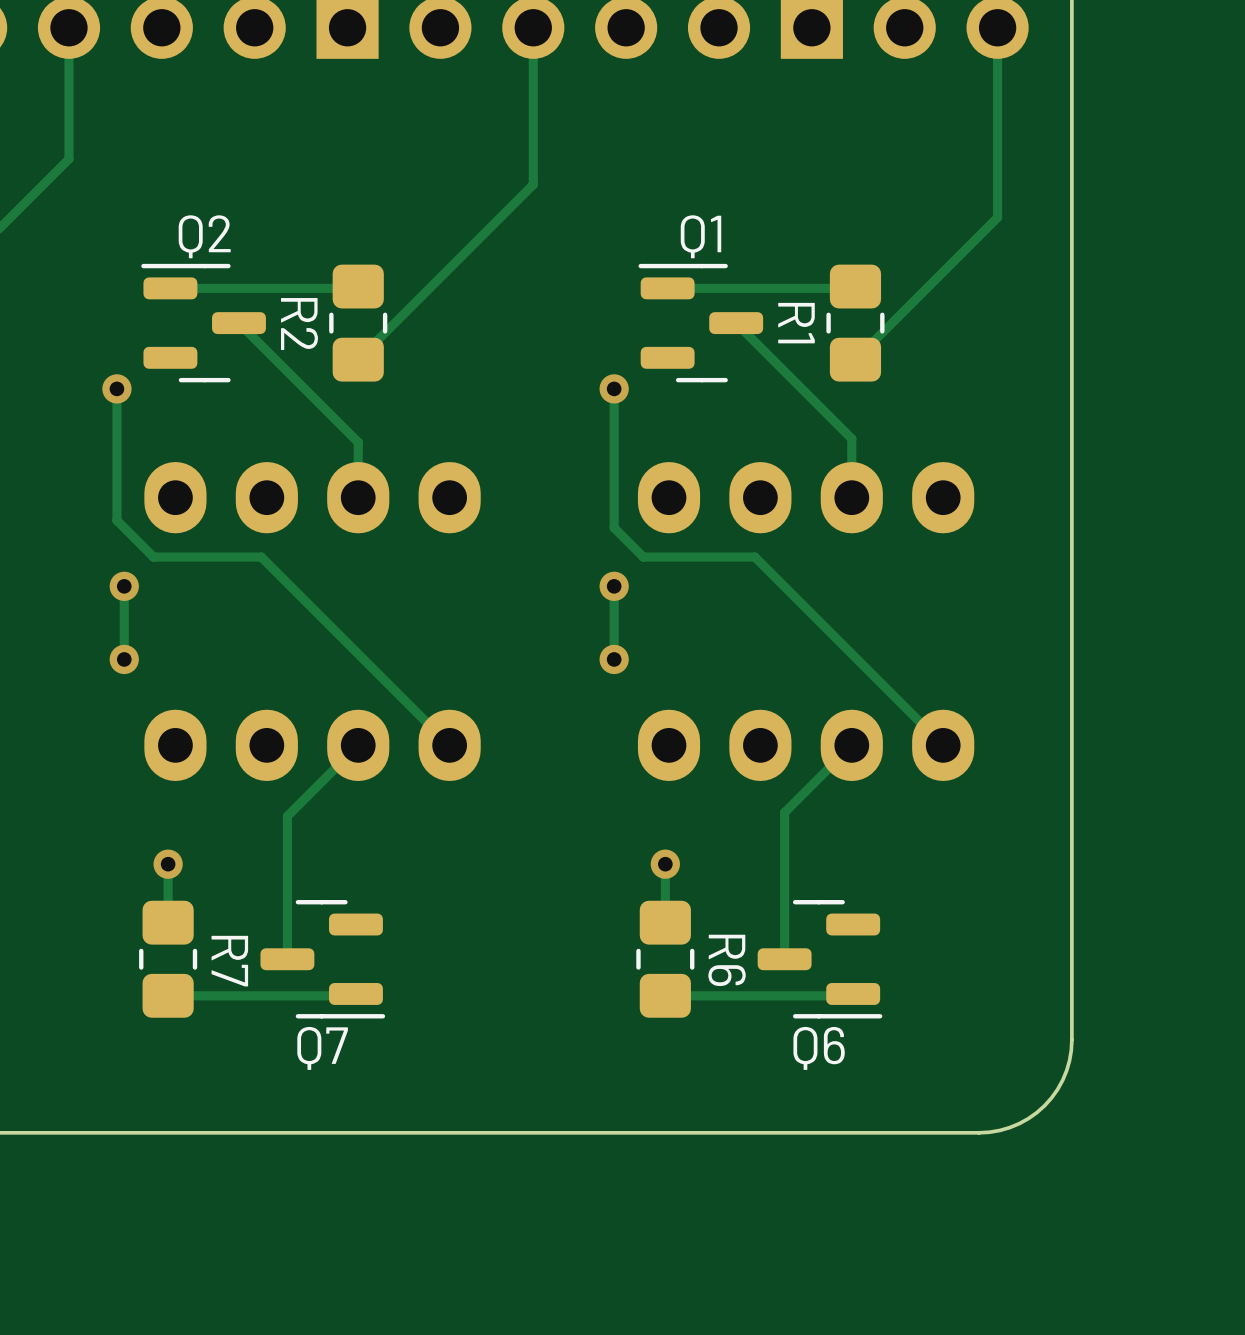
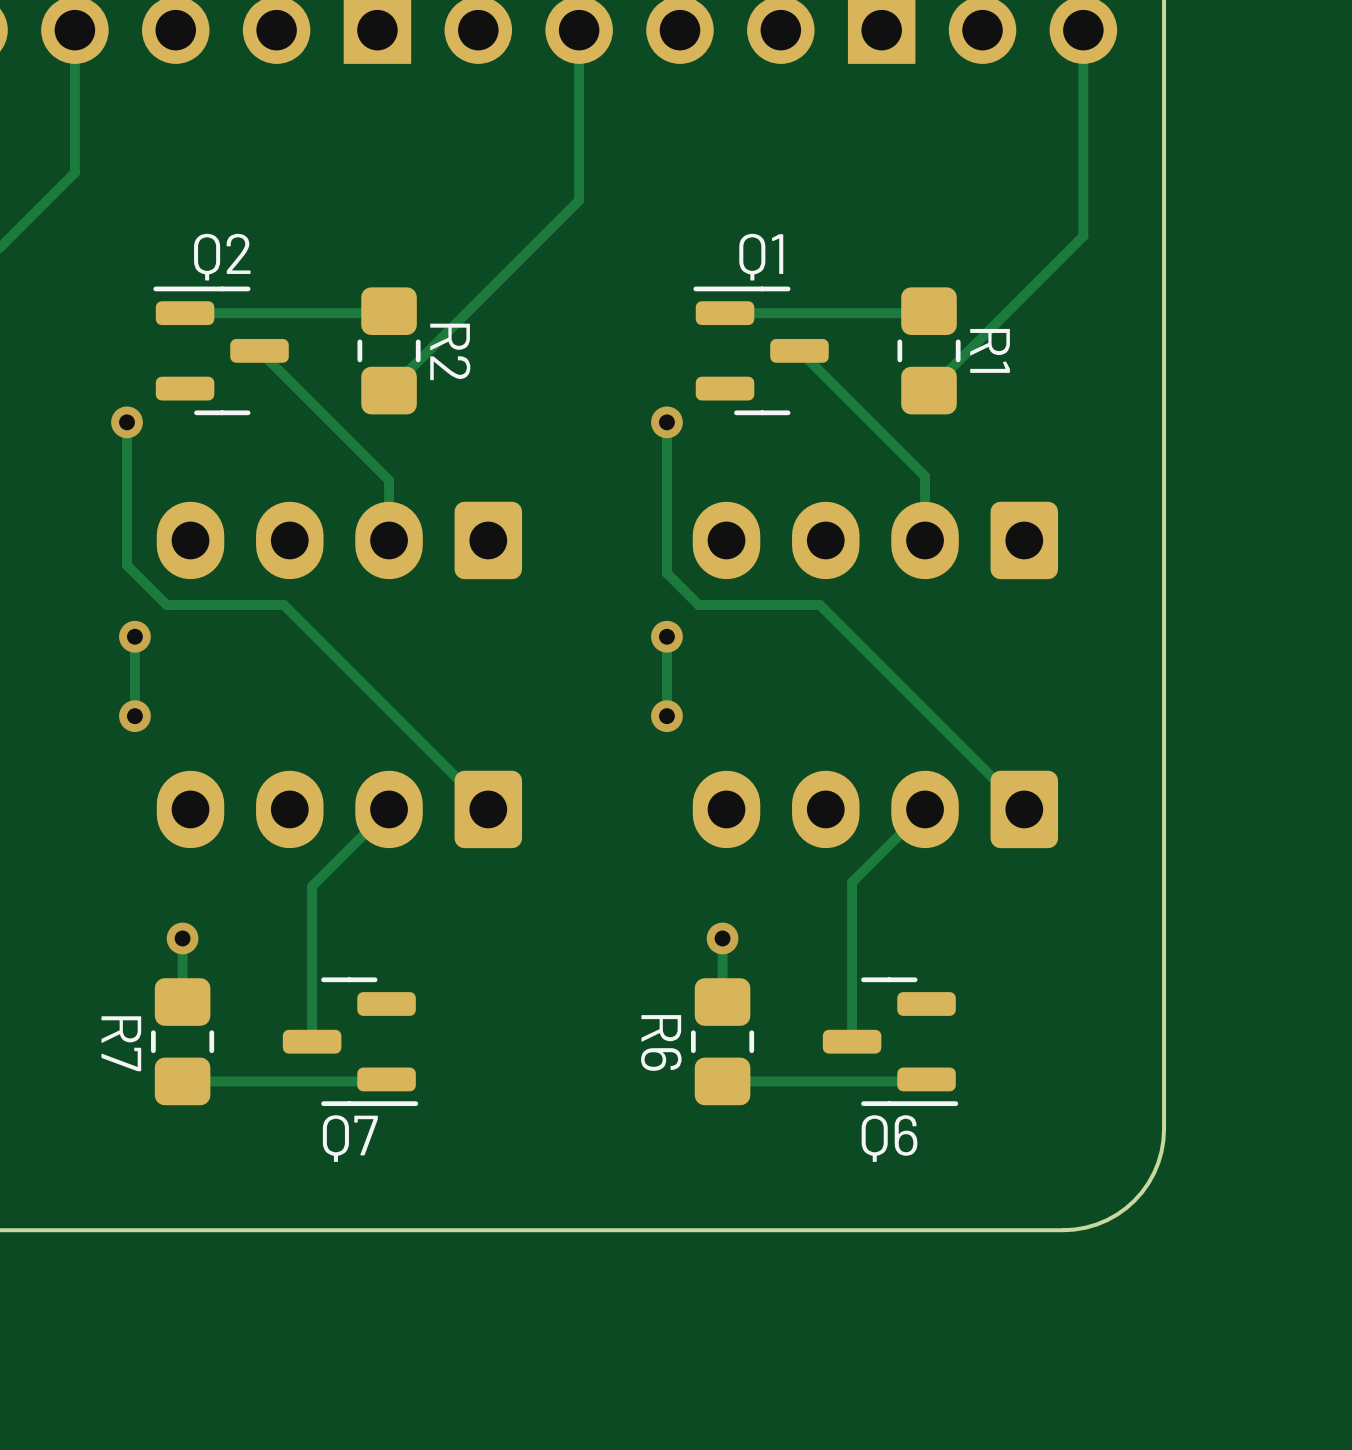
R1 name position: R1 (796, 323) -> R1 (990, 350)
R2 name position: R2 (299, 324) -> R2 (450, 351)
part footprint: [144, 462, 481, 534] -> [156, 501, 523, 580]
part footprint: [637, 462, 975, 534] -> [692, 501, 1059, 580]
part footprint: [144, 709, 481, 782] -> [156, 770, 523, 849]
part footprint: [637, 709, 975, 782] -> [692, 770, 1059, 849]
R6 name position: R6 (727, 960) -> R6 (661, 1042)
R7 name position: R7 (229, 961) -> R7 (121, 1043)

